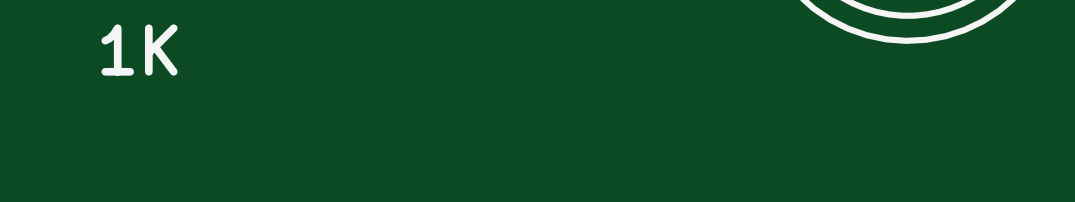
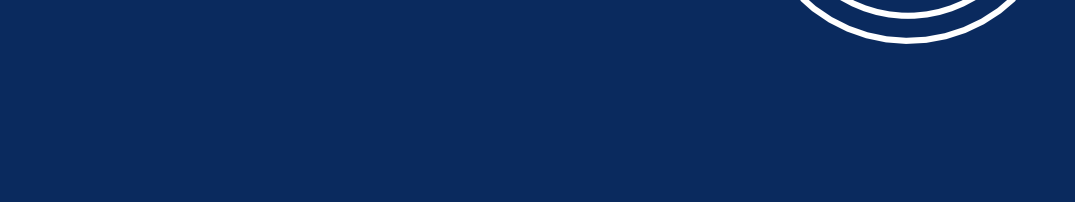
part value: 1K (139, 50) -> none

